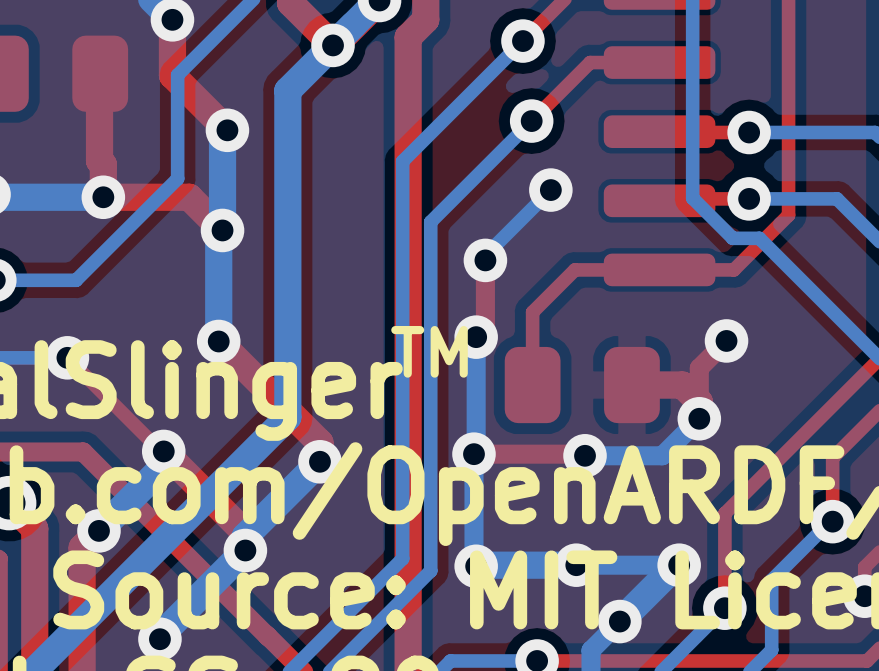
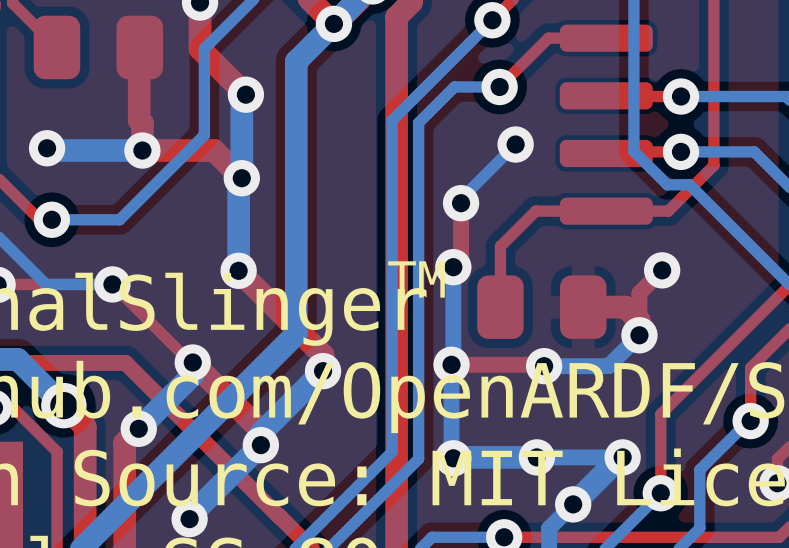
bottom track: (531, 121) (430, 222) (430, 570) -> (499, 86) (454, 86) (418, 122) (418, 458) (415, 462)

